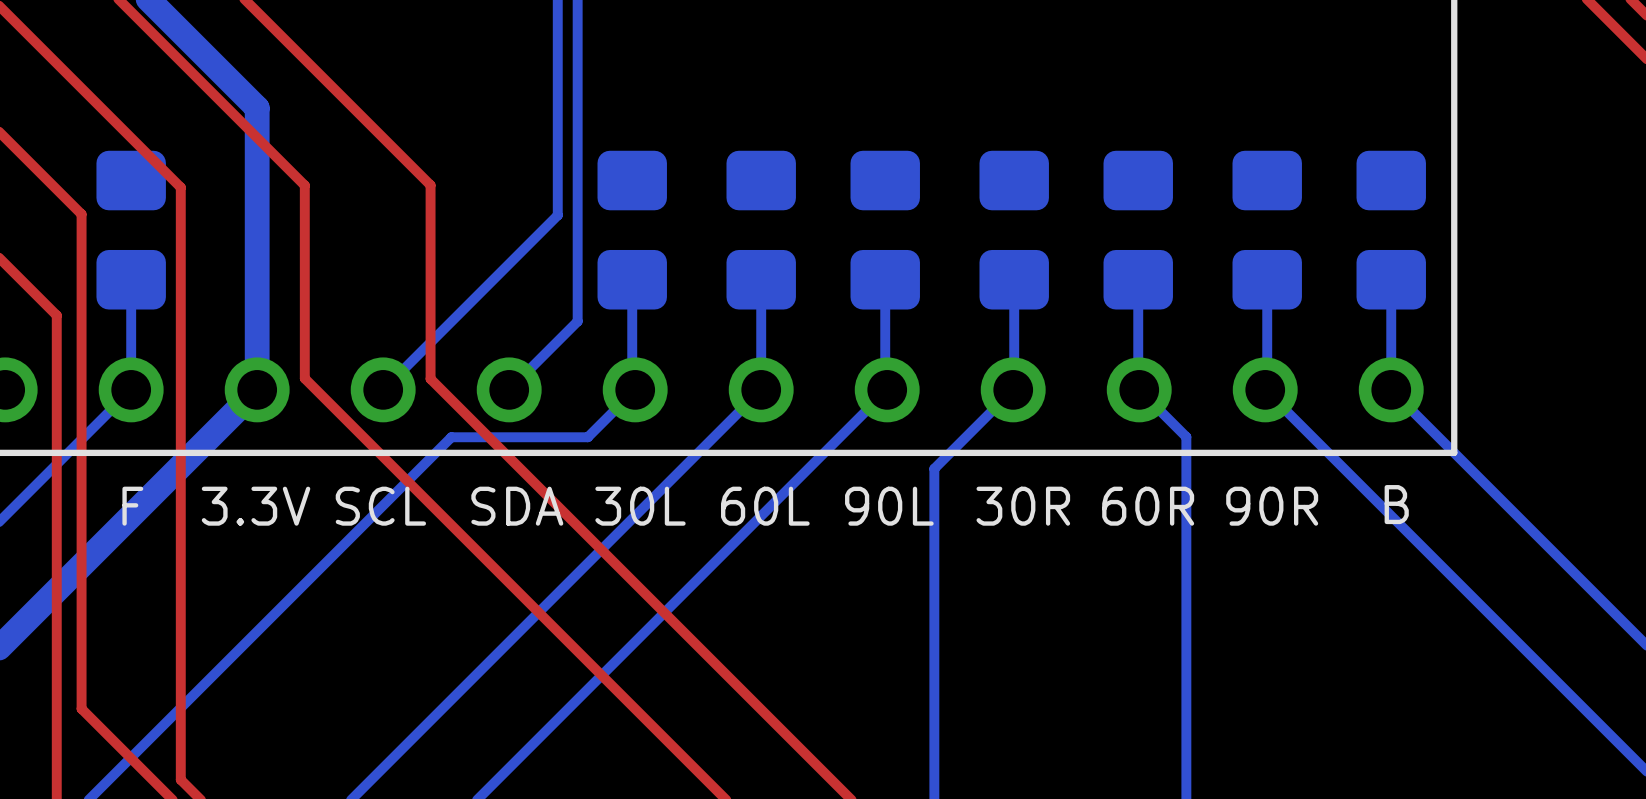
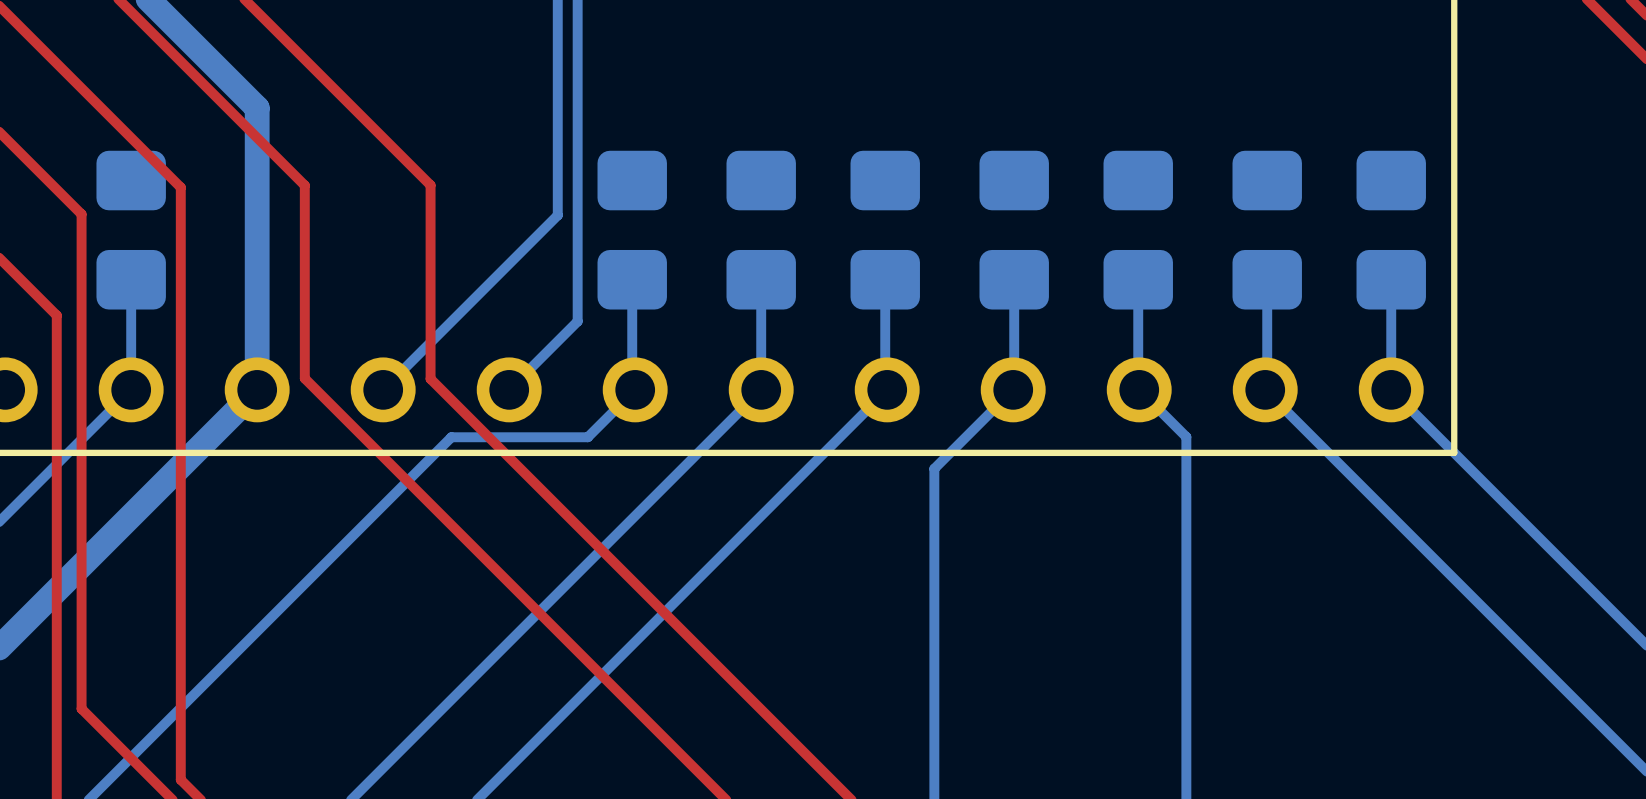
text: B (1396, 504) -> none
text: F (132, 506) -> none
text: 3.3V (256, 506) -> none
text: SCL (380, 506) -> none
text: SDA (517, 506) -> none
text: 30L (640, 506) -> none
text: 60L (765, 506) -> none
text: 90L (889, 506) -> none
text: 30R (1023, 506) -> none
text: 60R (1148, 506) -> none
text: 90R (1272, 506) -> none

